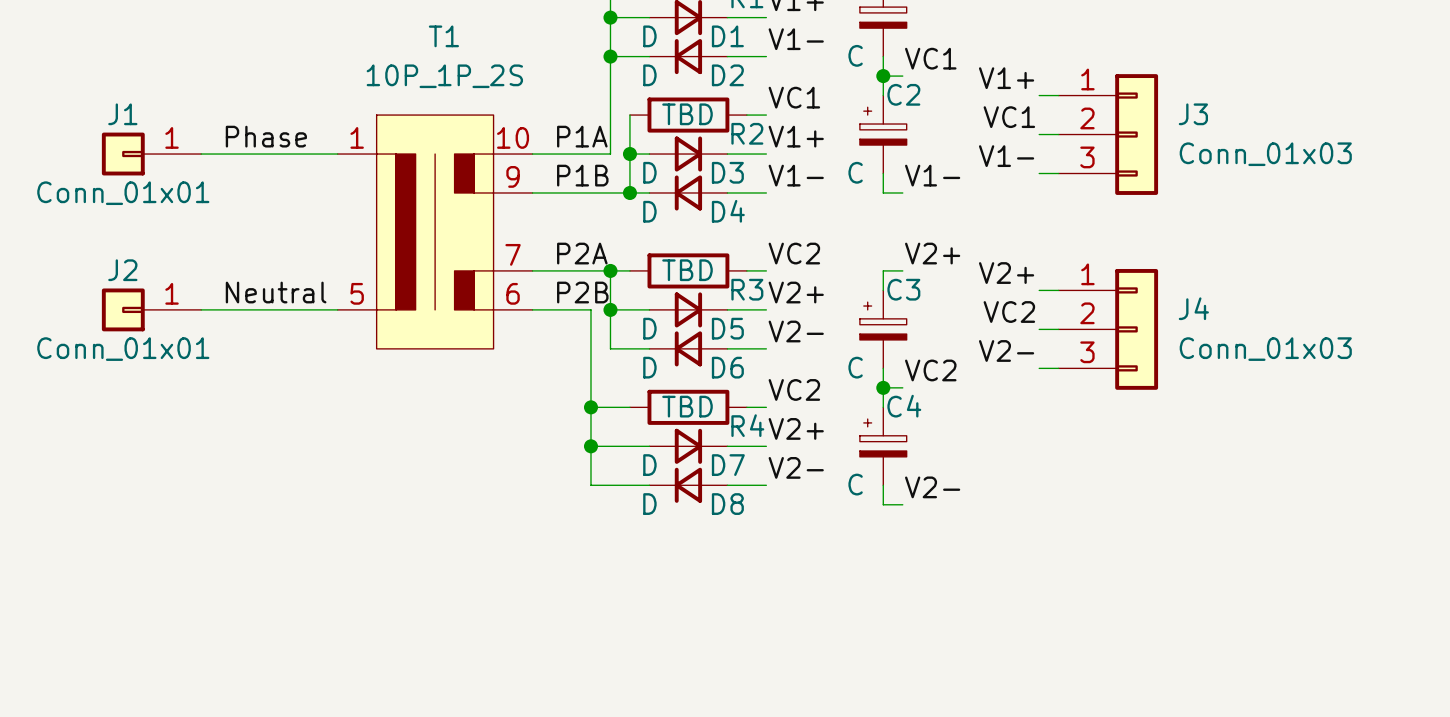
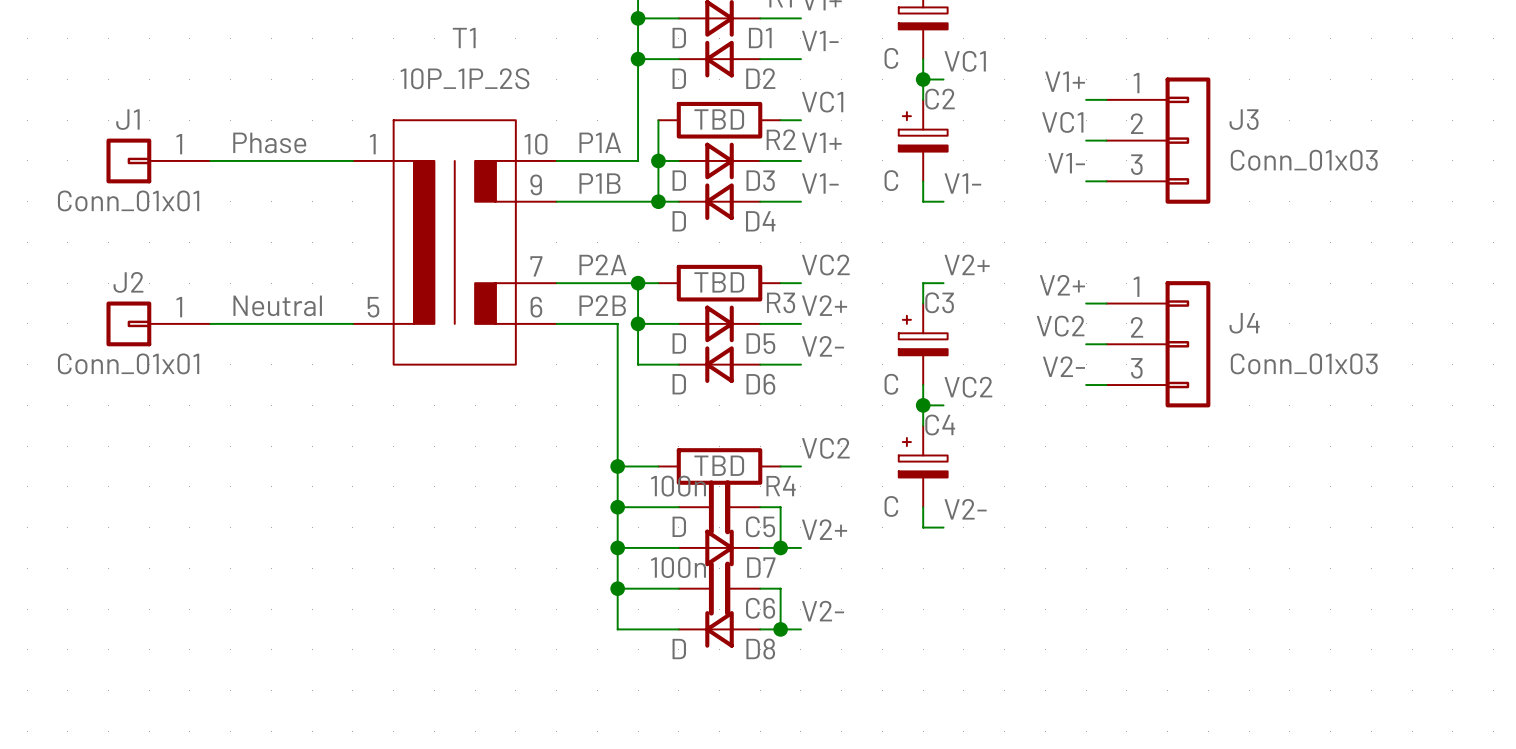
label: VC2 (794, 389) -> none
wire: (590, 407) (629, 407) -> (760, 547) (800, 547)
junction: (590, 407) -> none
R4 position: (688, 407) -> (719, 466)
wire: (746, 407) (766, 407) -> none
label: V2+ (796, 428) -> VC2 (825, 448)
D7 position: (688, 446) -> (719, 547)
D7 value position: D (649, 465) -> D (679, 526)
label position: V2- (796, 467) -> V2- (823, 611)
wire: none -> (617, 507) (617, 629) (678, 629)
junction: none -> (617, 507)
D8 position: (688, 485) -> (719, 629)
C5: none -> 100n (719, 507)
wire: (746, 485) (766, 485) -> (780, 507) (780, 547)
label: none -> V2+ (824, 529)
wire: none -> (617, 547) (678, 547)
junction: none -> (617, 547)
junction: none -> (780, 547)
wire: none -> (617, 588) (678, 588)
junction: none -> (617, 588)
C6: none -> 100n (719, 588)
wire: none -> (760, 588) (780, 588) (780, 629)
wire: none -> (760, 629) (800, 629)
junction: none -> (780, 629)

